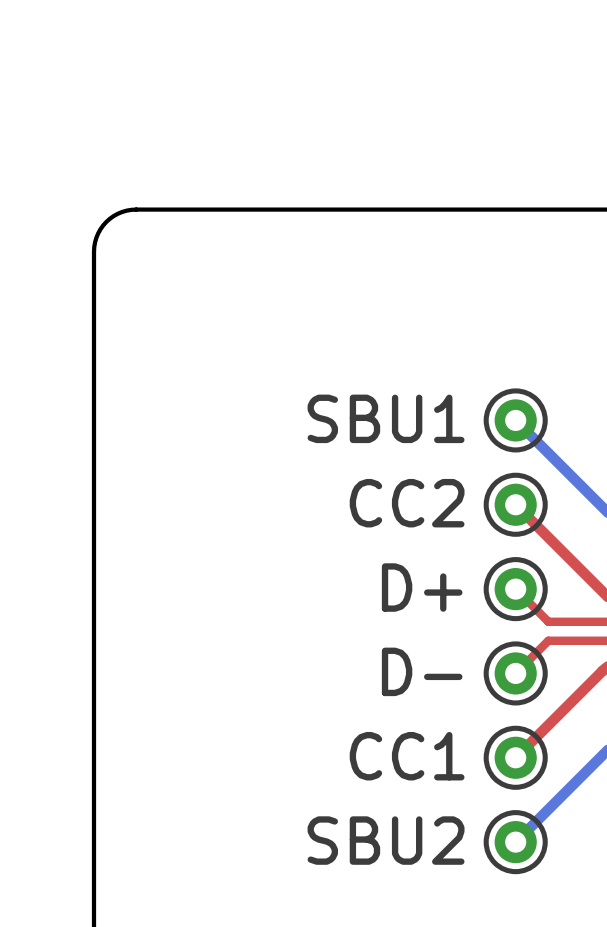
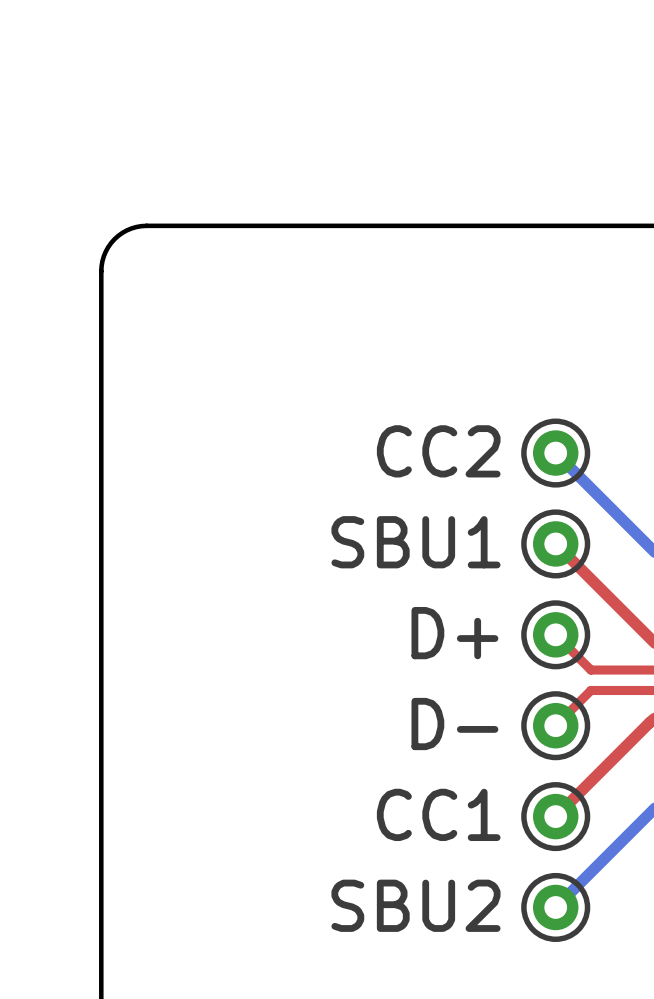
text: SBU1 (386, 418) -> CC2 (438, 451)
text: CC2 (407, 503) -> SBU1 (415, 542)

